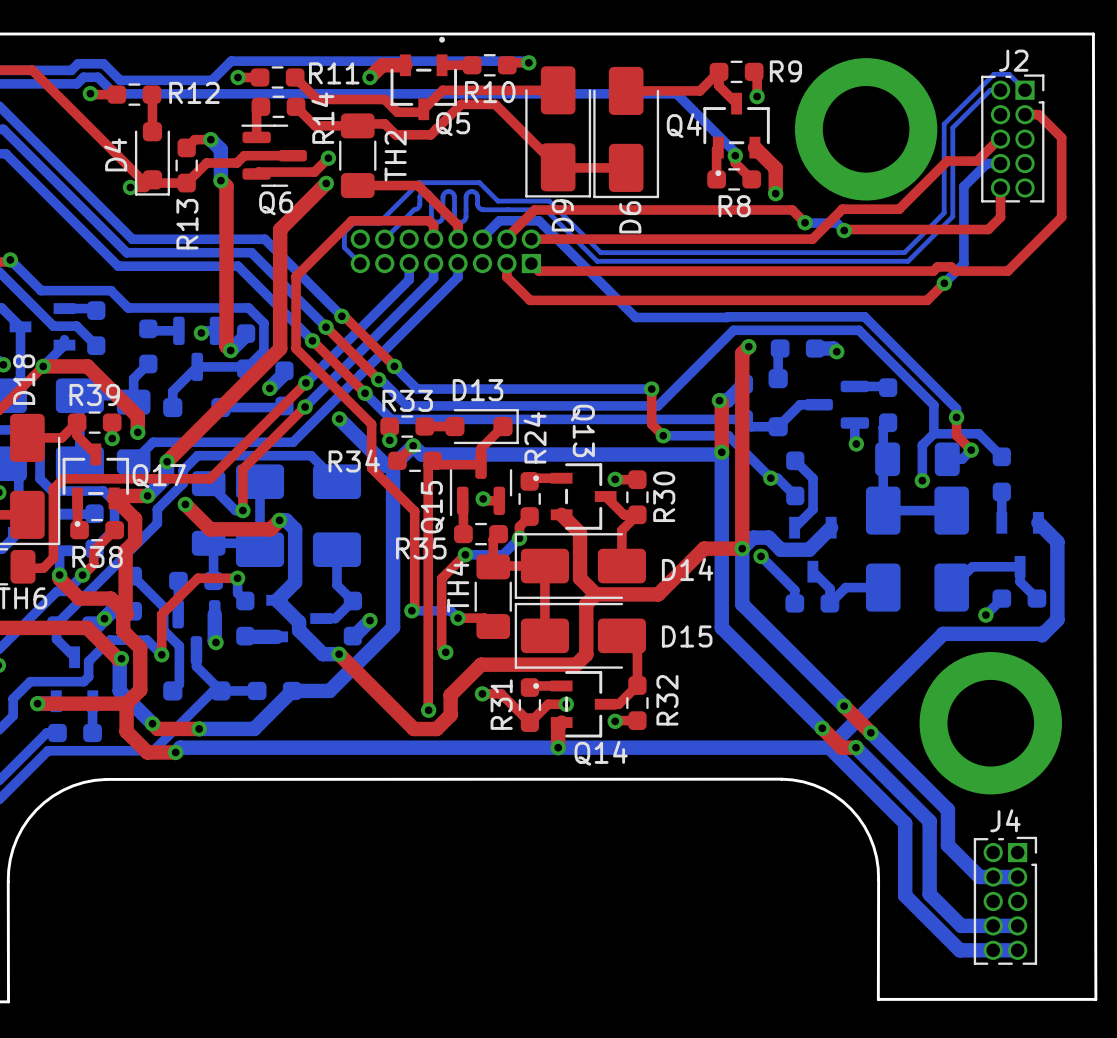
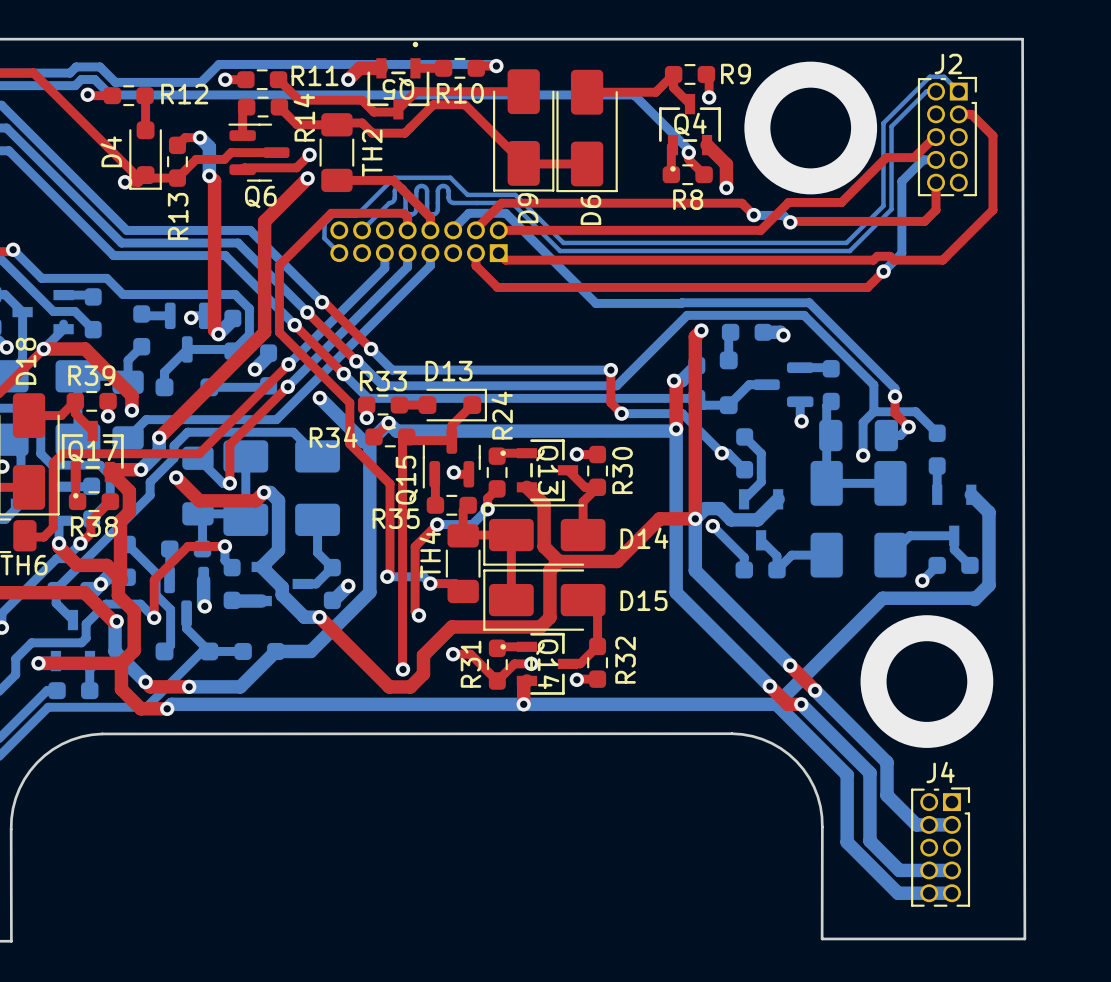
Q5 name rotation: 0° (453, 124) -> 180° (398, 88)
Q4 name position: Q4 (684, 125) -> Q4 (690, 124)
Q13 name position: Q13 (582, 430) -> Q13 (547, 470)
Q17 name position: Q17 (159, 476) -> Q17 (93, 451)
Q14 name rotation: 0° (601, 753) -> 90° clockwise (547, 664)

